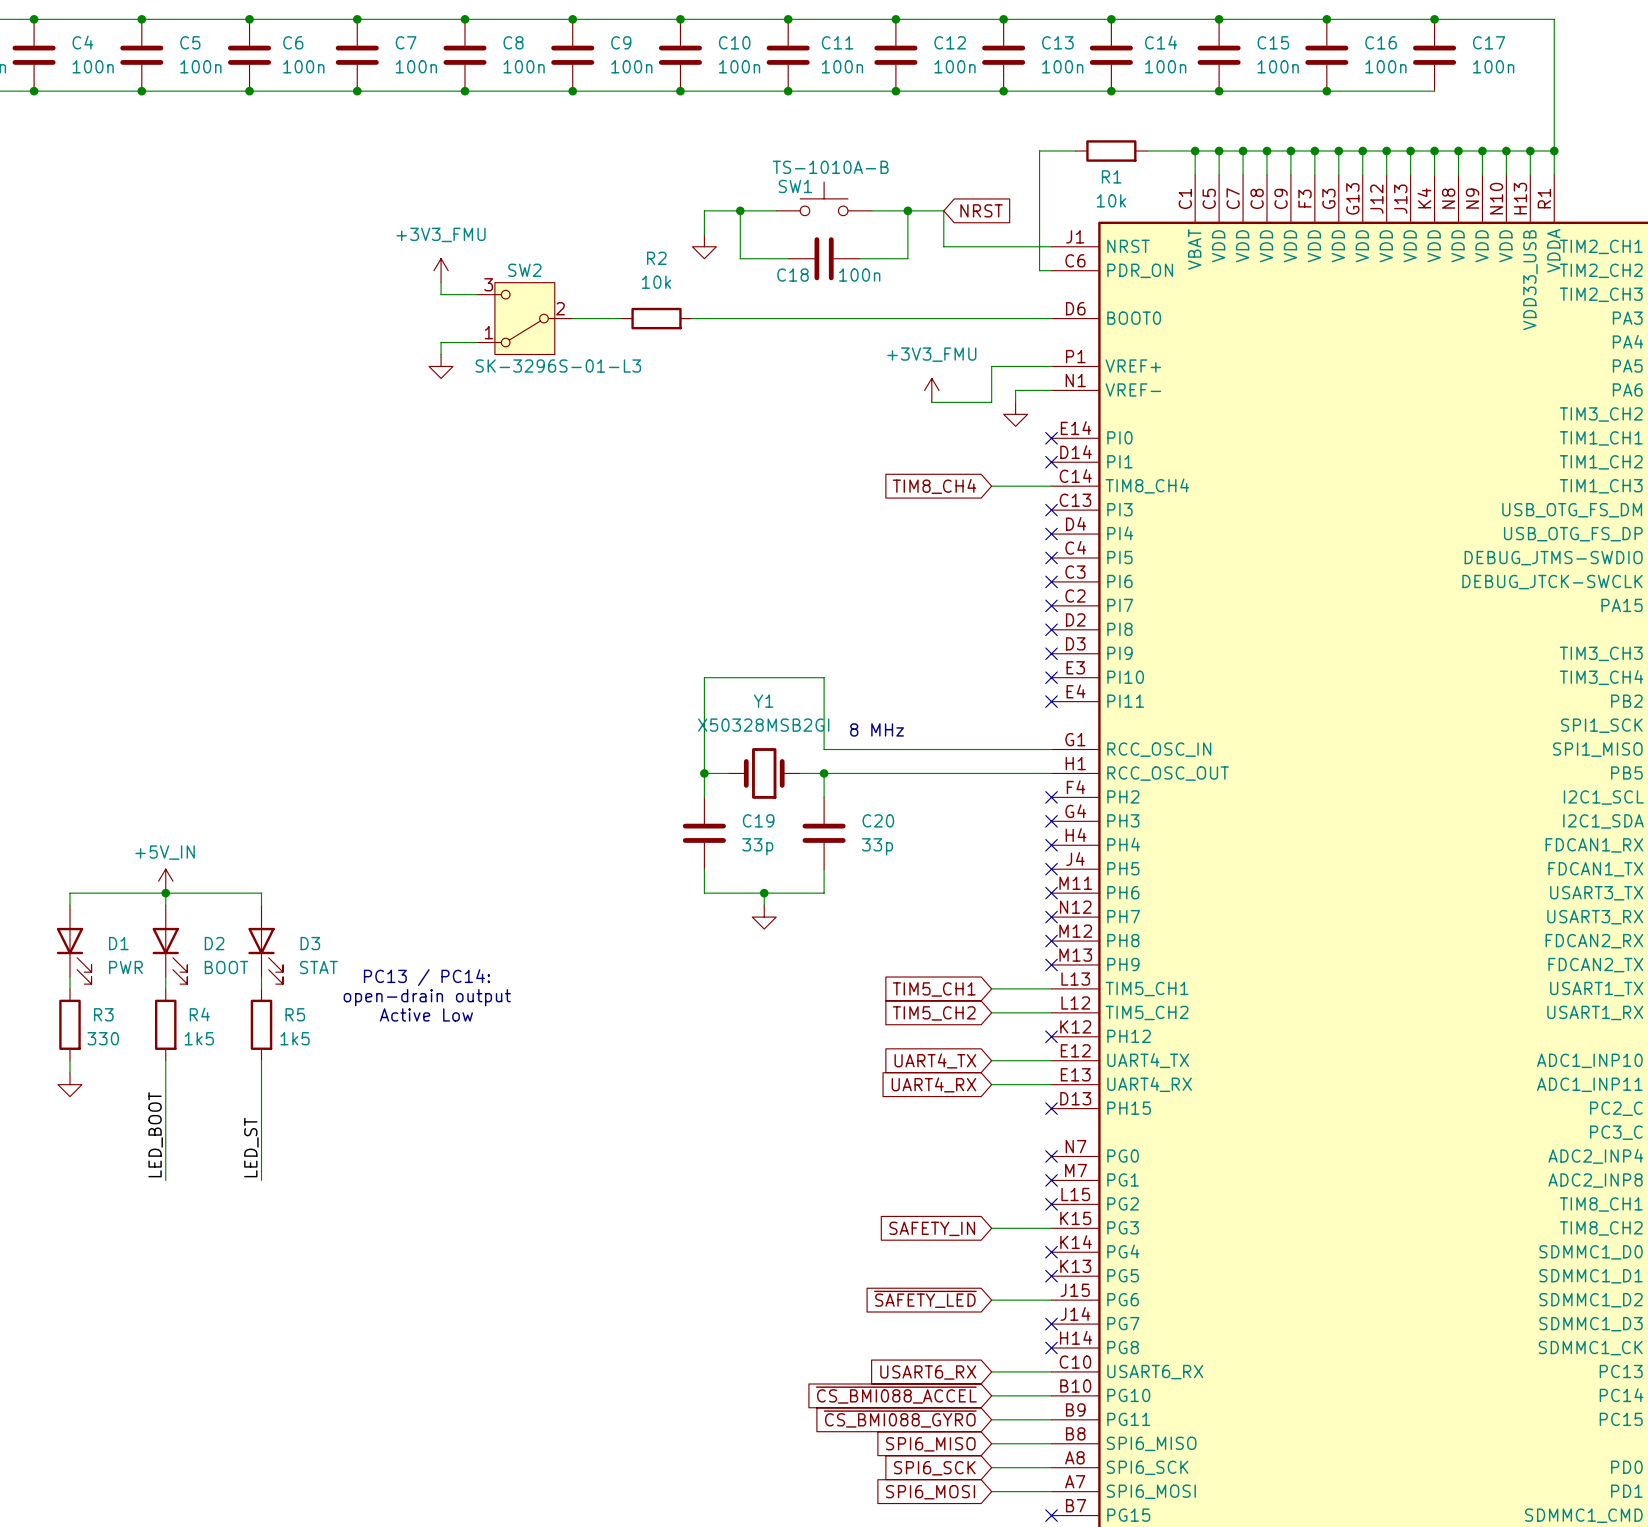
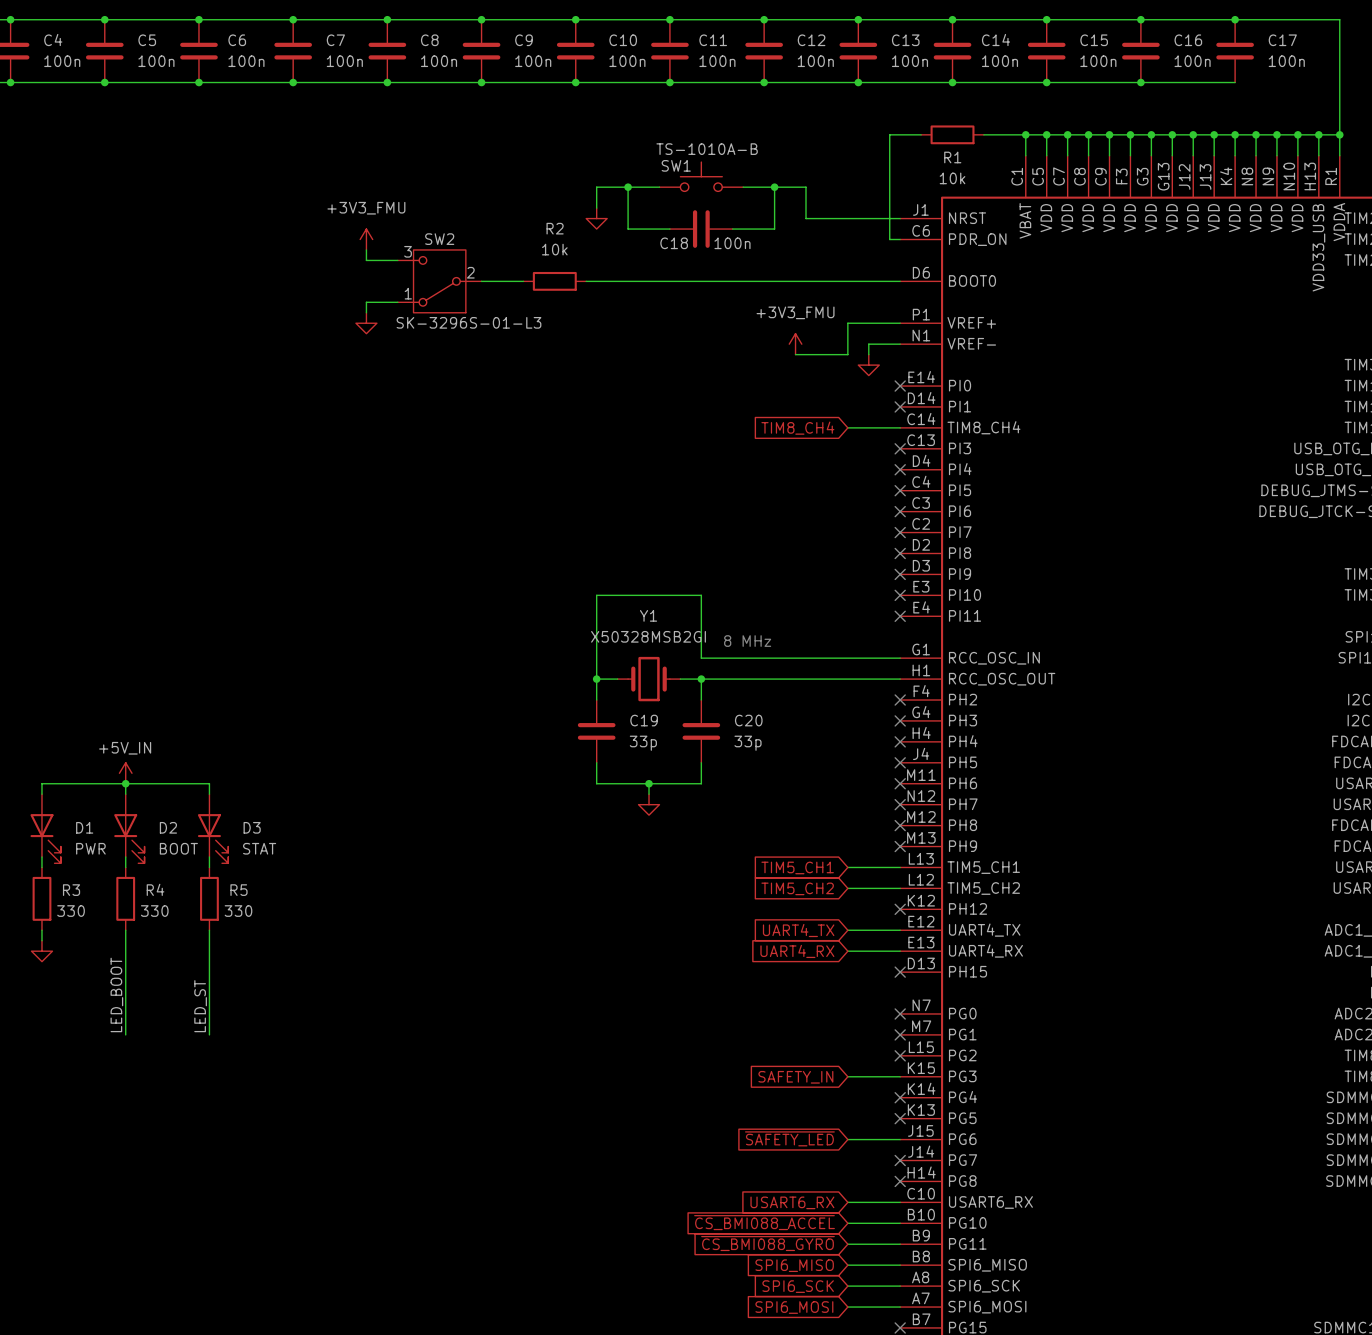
global label: NRST (981, 210) -> none
text: PC13 / PC14: (426, 977) -> none
text: open-drain output (427, 997) -> none
text: Active Low (426, 1014) -> none
R4 value: 1k5 (199, 1038) -> 330 (154, 911)
R5 value: 1k5 (295, 1038) -> 330 (238, 911)

